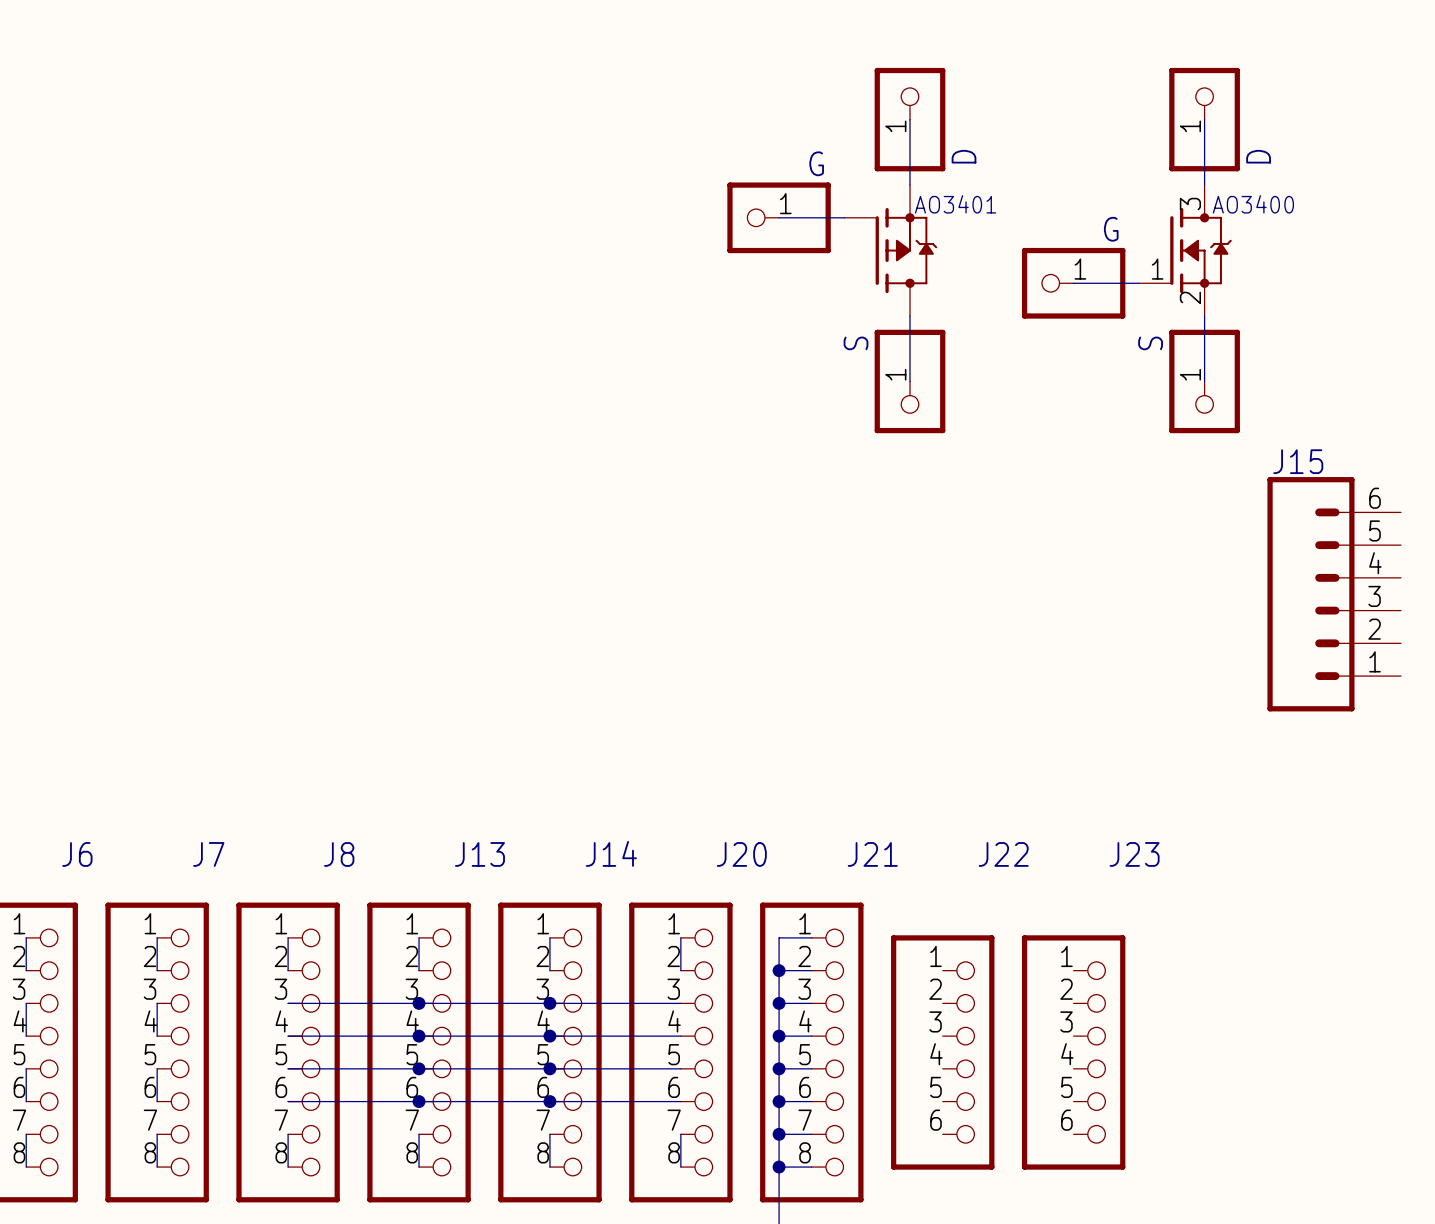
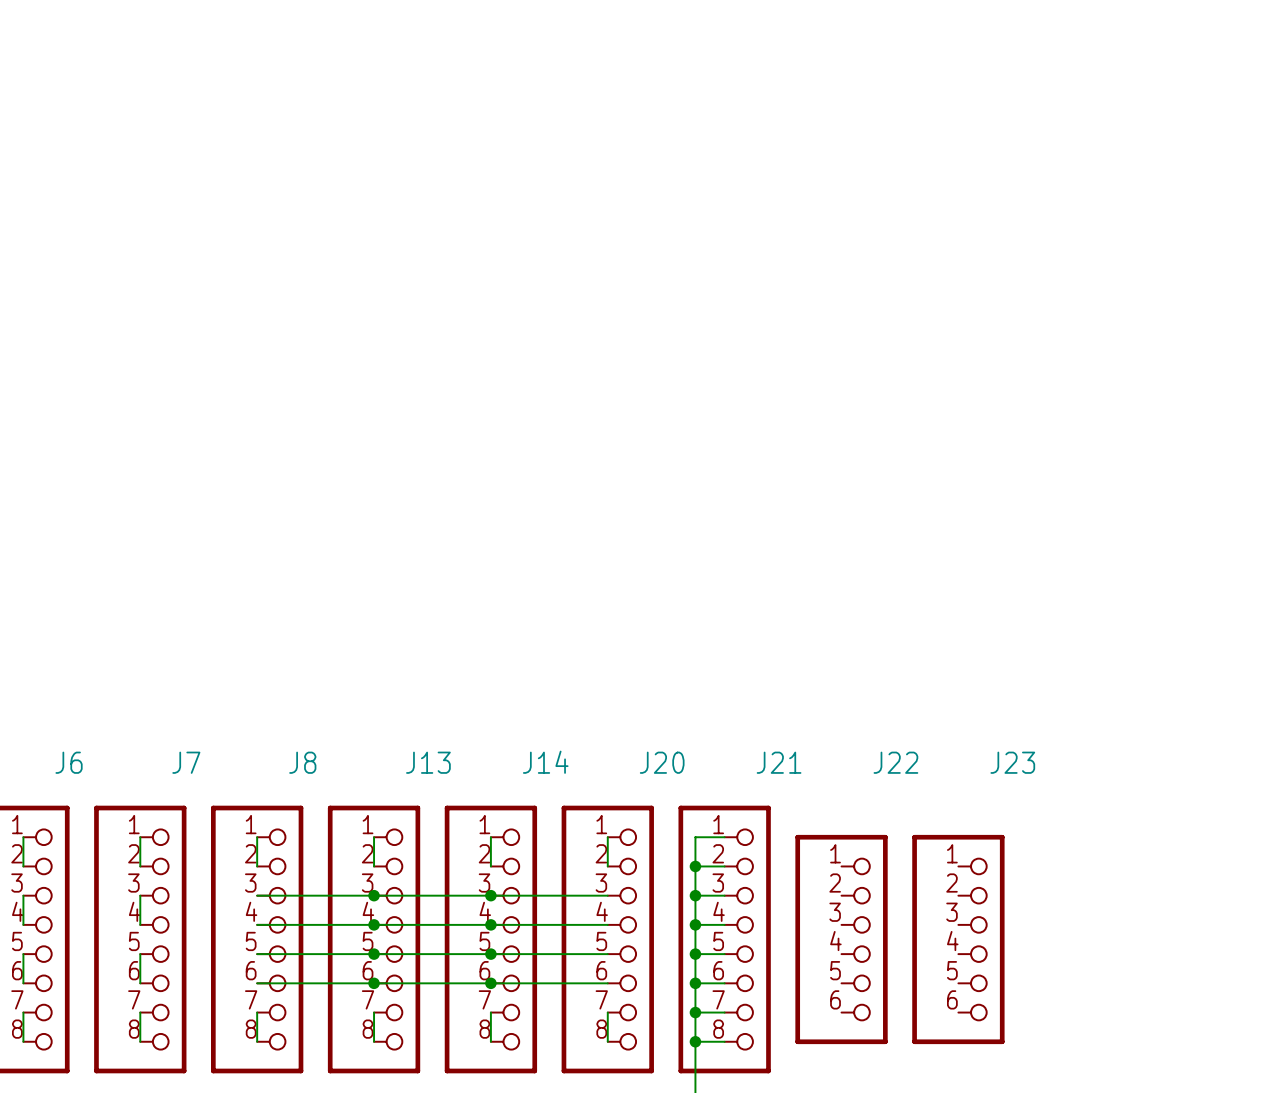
wire: (910, 119) (910, 185) -> none
part: D (910, 119) -> none
wire: (1204, 119) (1204, 185) -> none
part: D (1204, 119) -> none
wire: (779, 217) (844, 217) -> none
part: G (779, 217) -> none
AO3401: (890, 250) -> none
AO3400: (1185, 250) -> none
wire: (1073, 283) (1139, 283) -> none
part: G (1073, 283) -> none
wire: (910, 316) (910, 381) -> none
wire: (1204, 316) (1204, 381) -> none
part: S (910, 381) -> none
part: S (1204, 381) -> none
J15: (1334, 594) -> none

